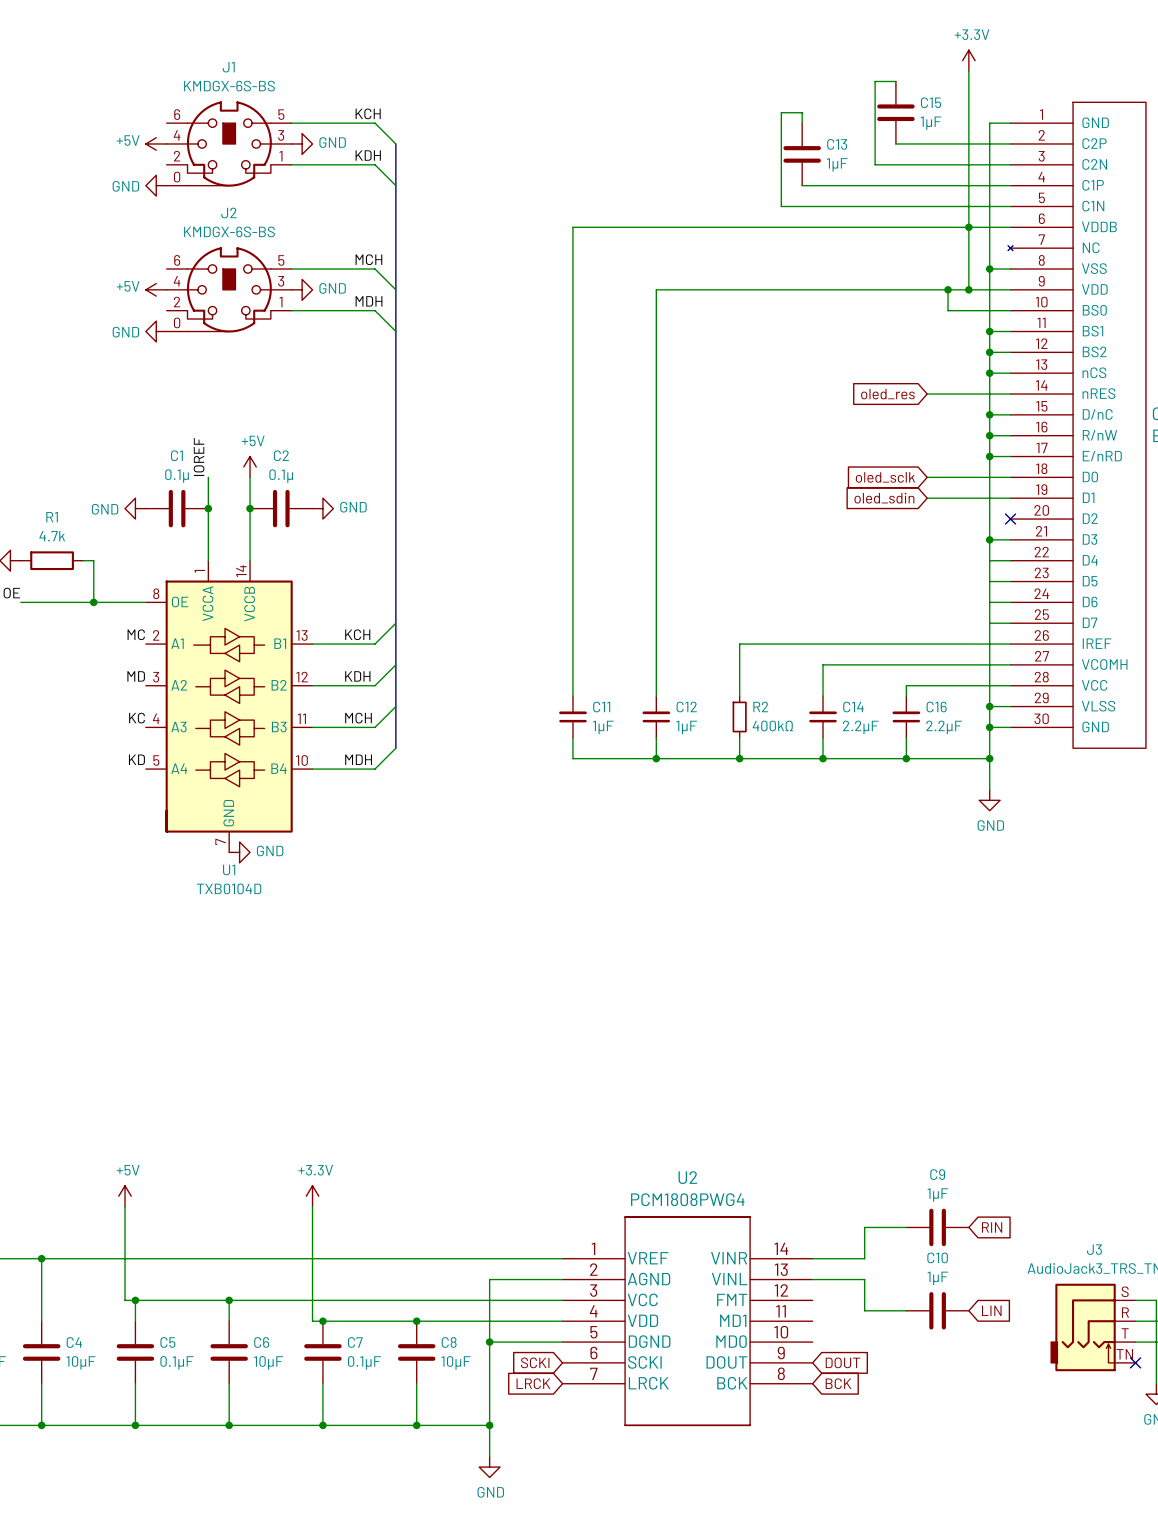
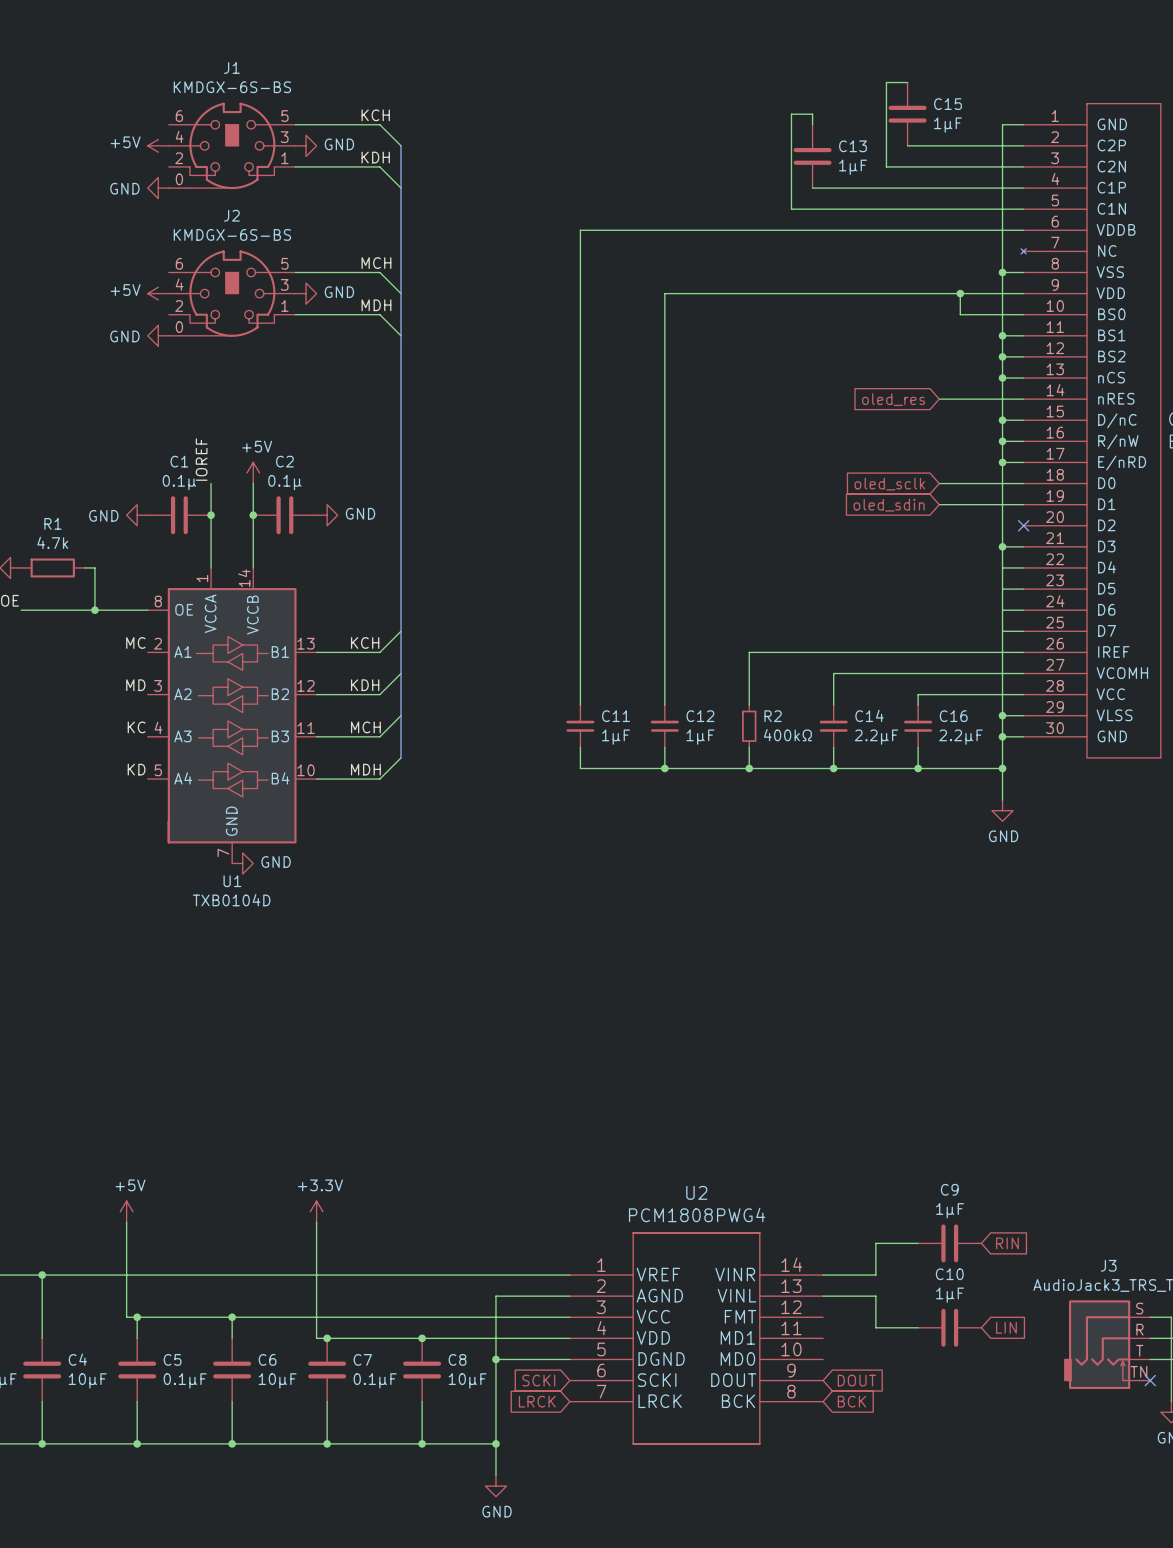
power symbol: +3.3V (968, 60) -> none
wire: (968, 71) (968, 289) -> none
junction: (968, 227) -> none
junction: (968, 289) -> none

